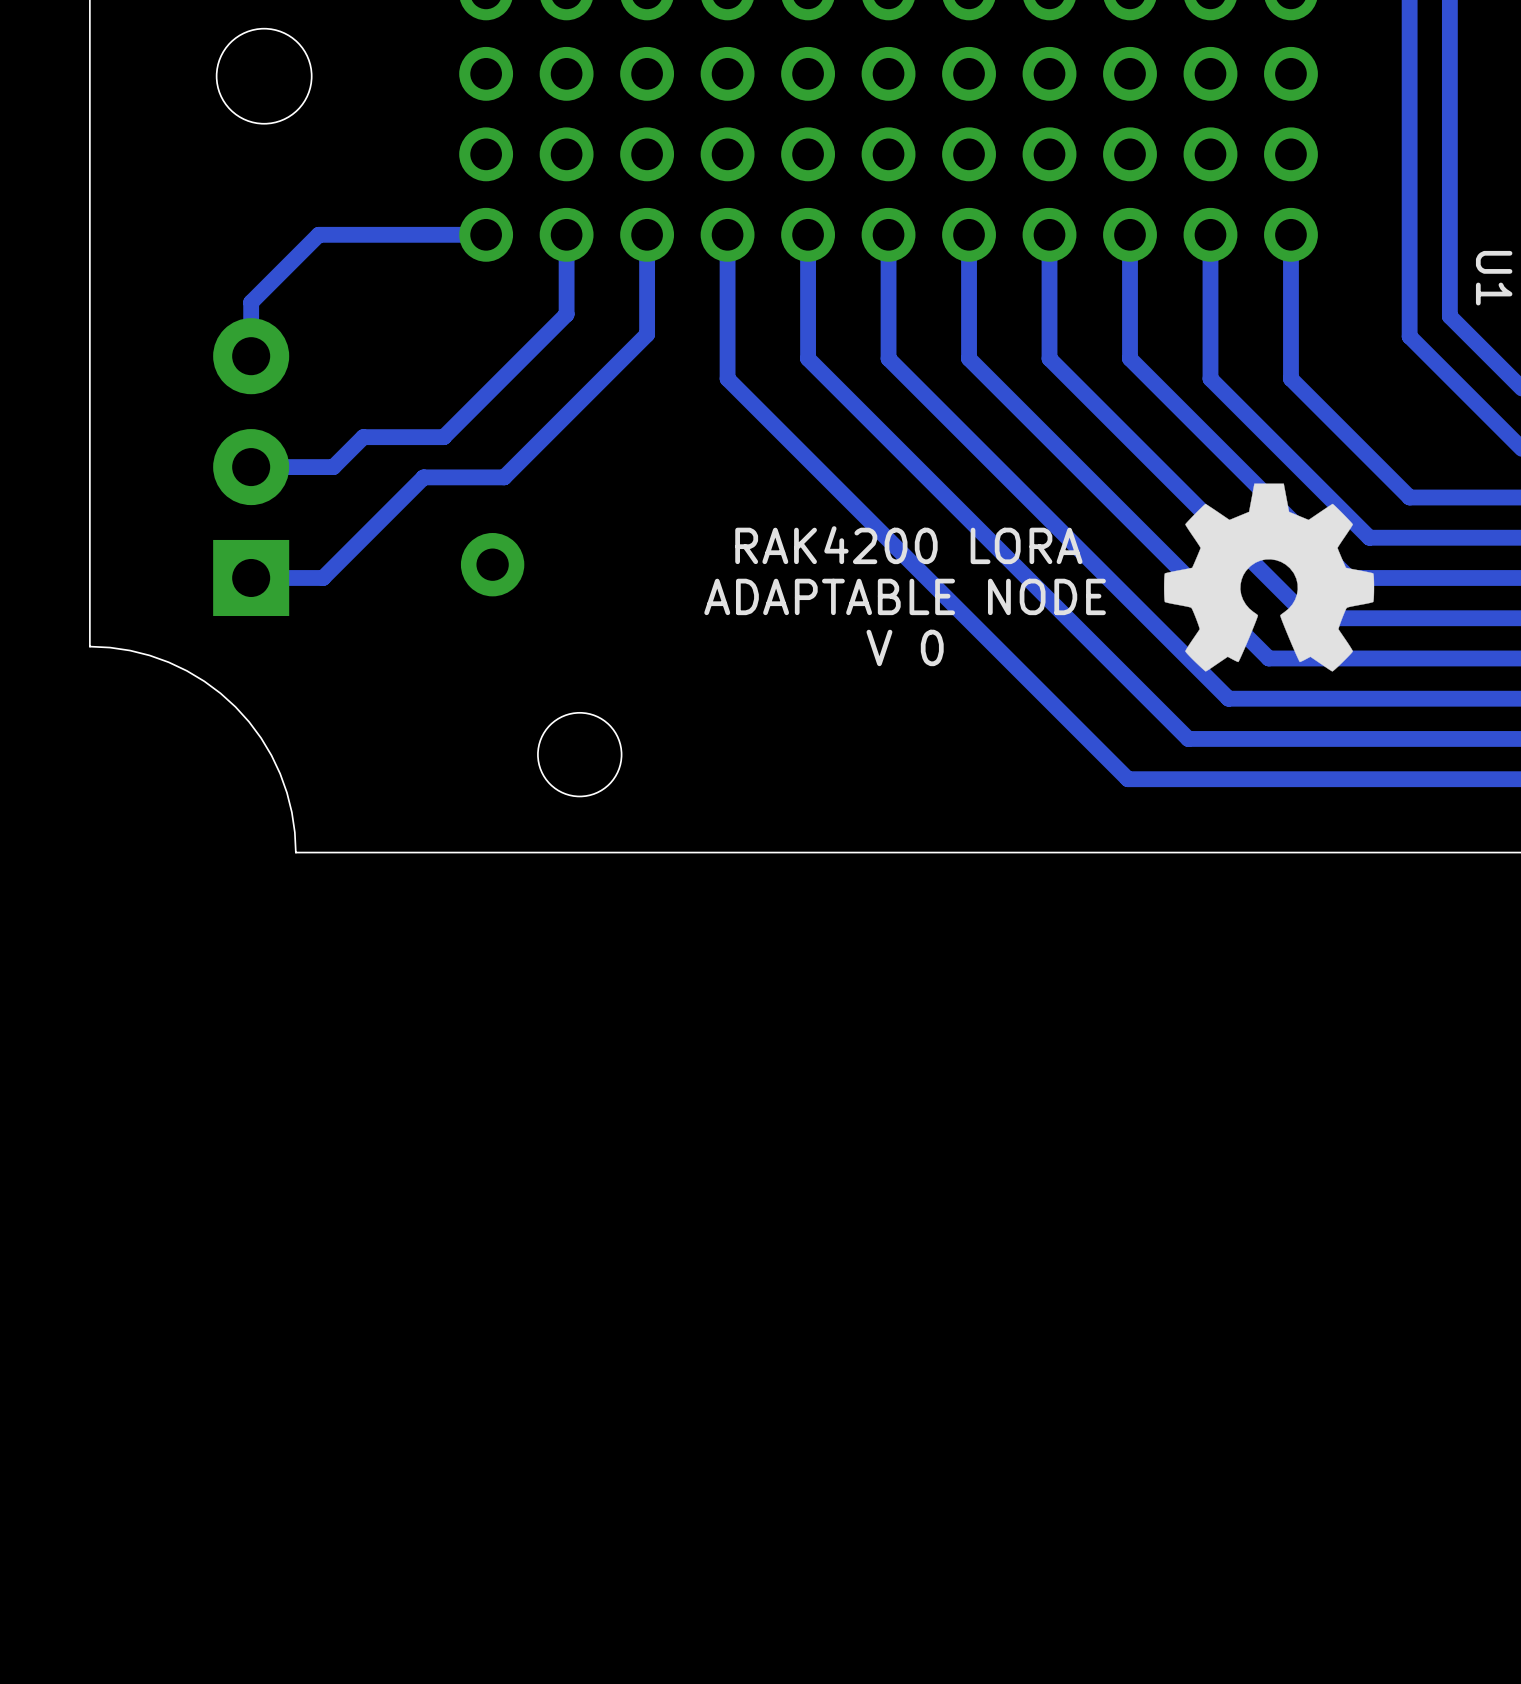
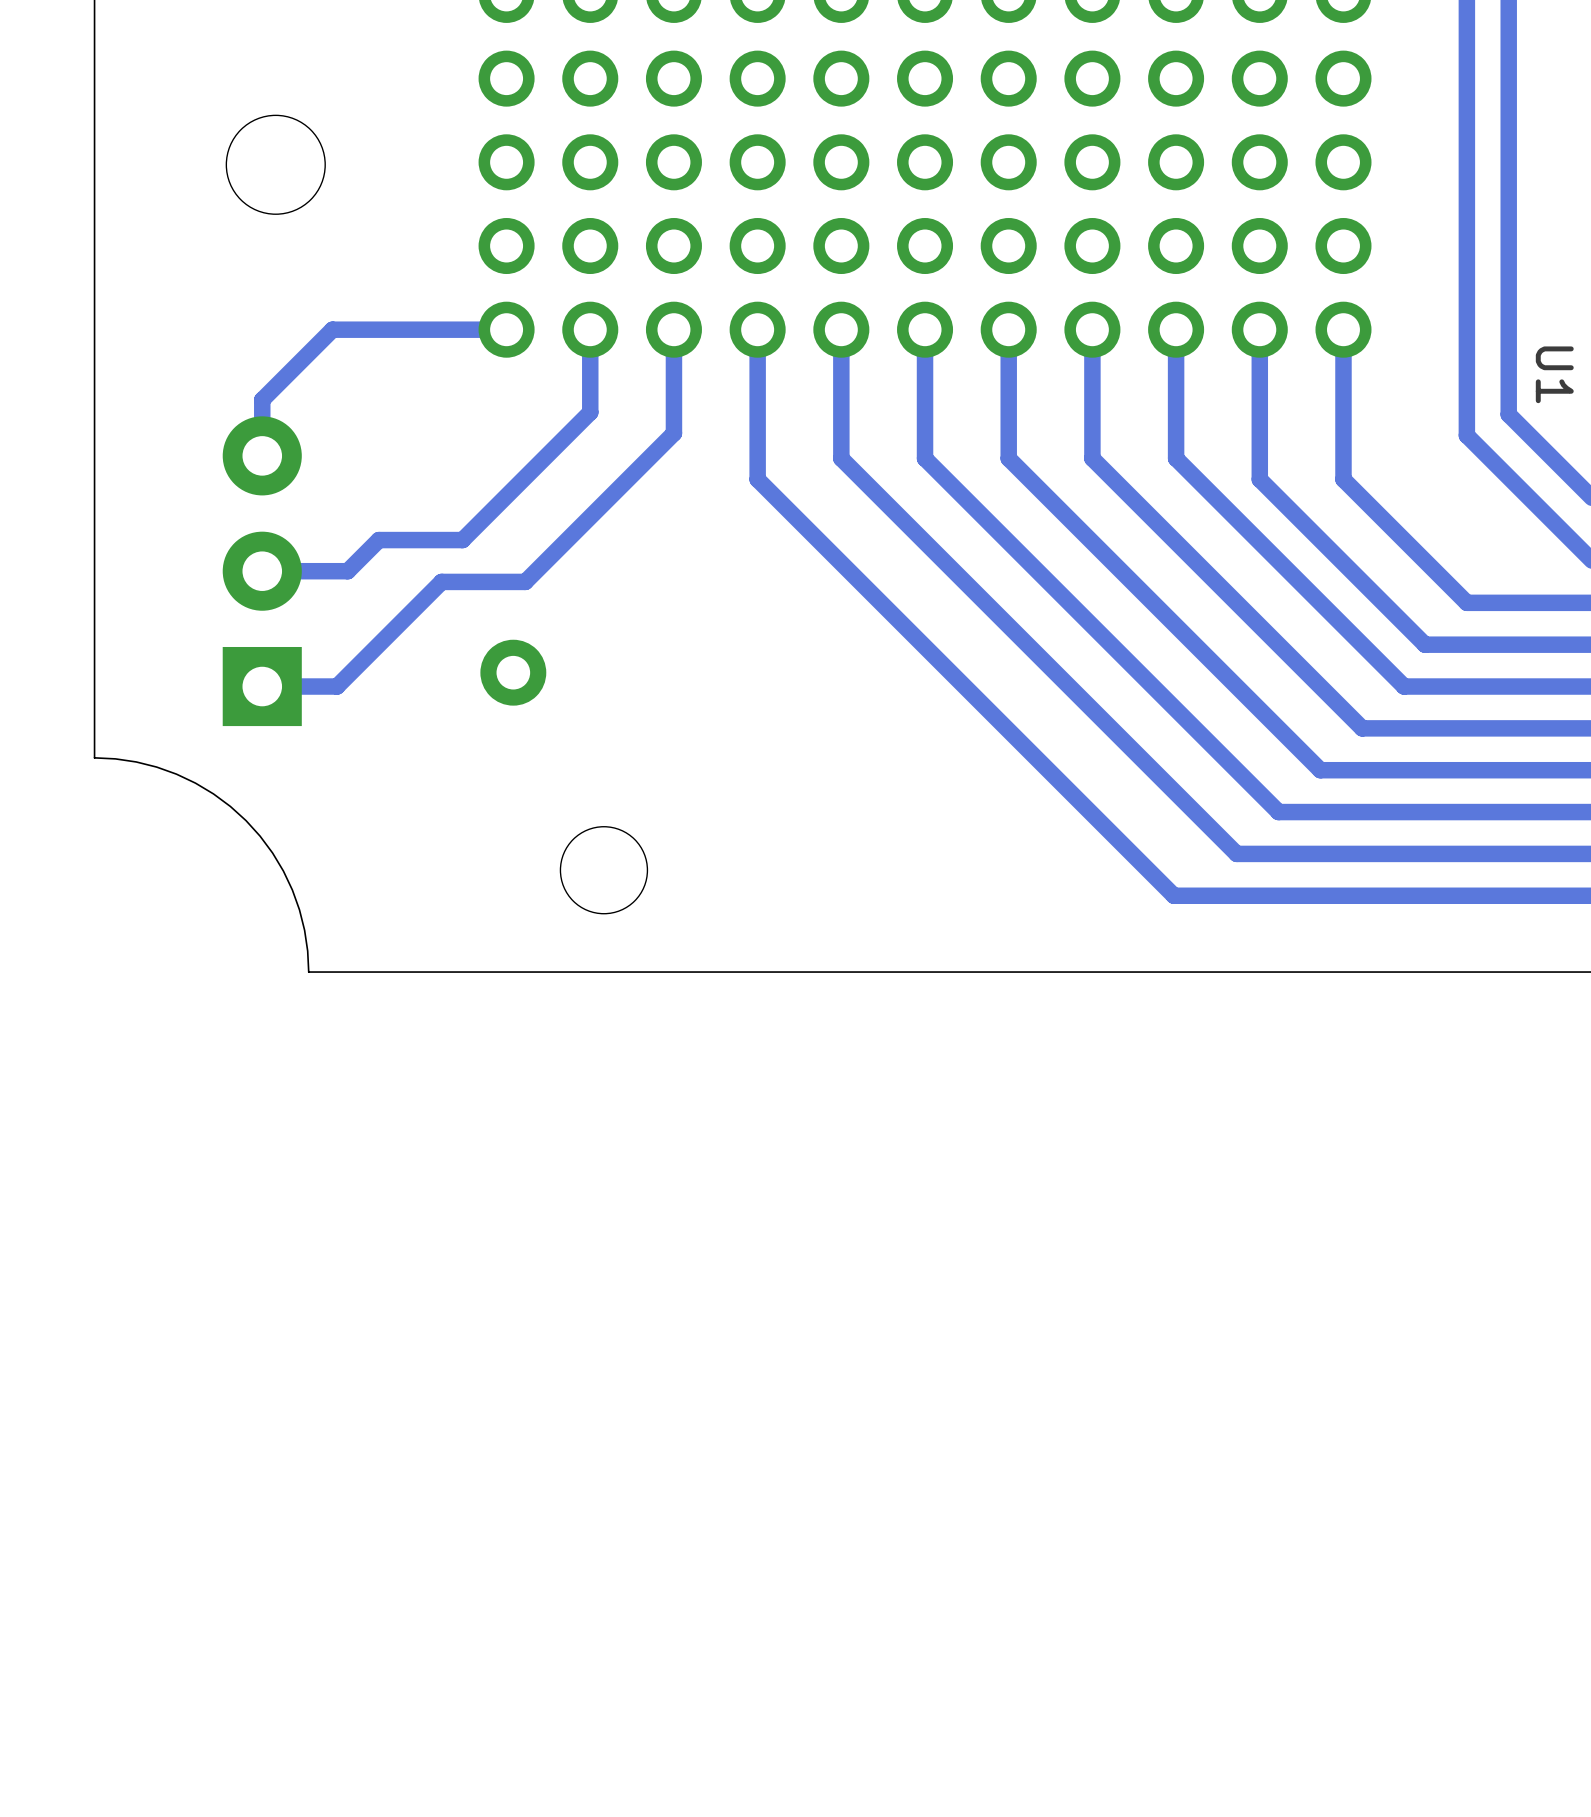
drawing: [1164, 483, 1375, 672] -> none
text: RAK4200 LORA (908, 545) -> none
text: ADAPTABLE NODE (905, 596) -> none
text: V 0 (905, 647) -> none

